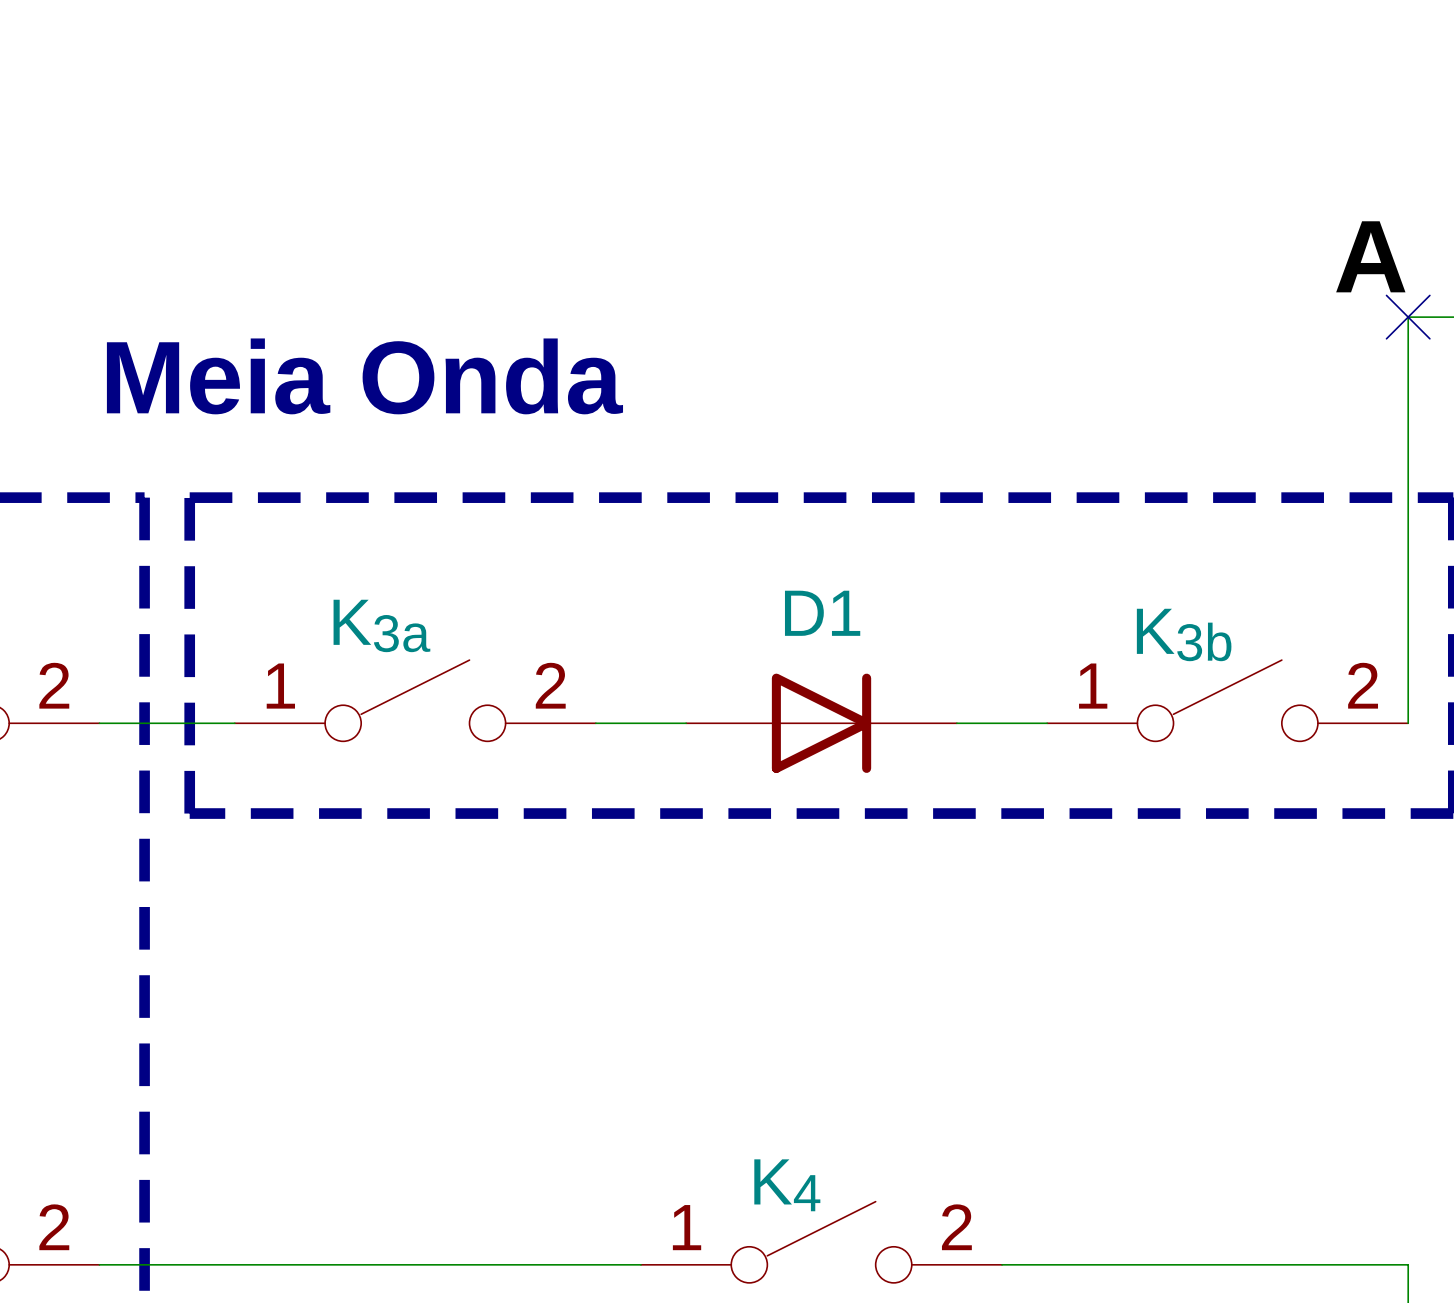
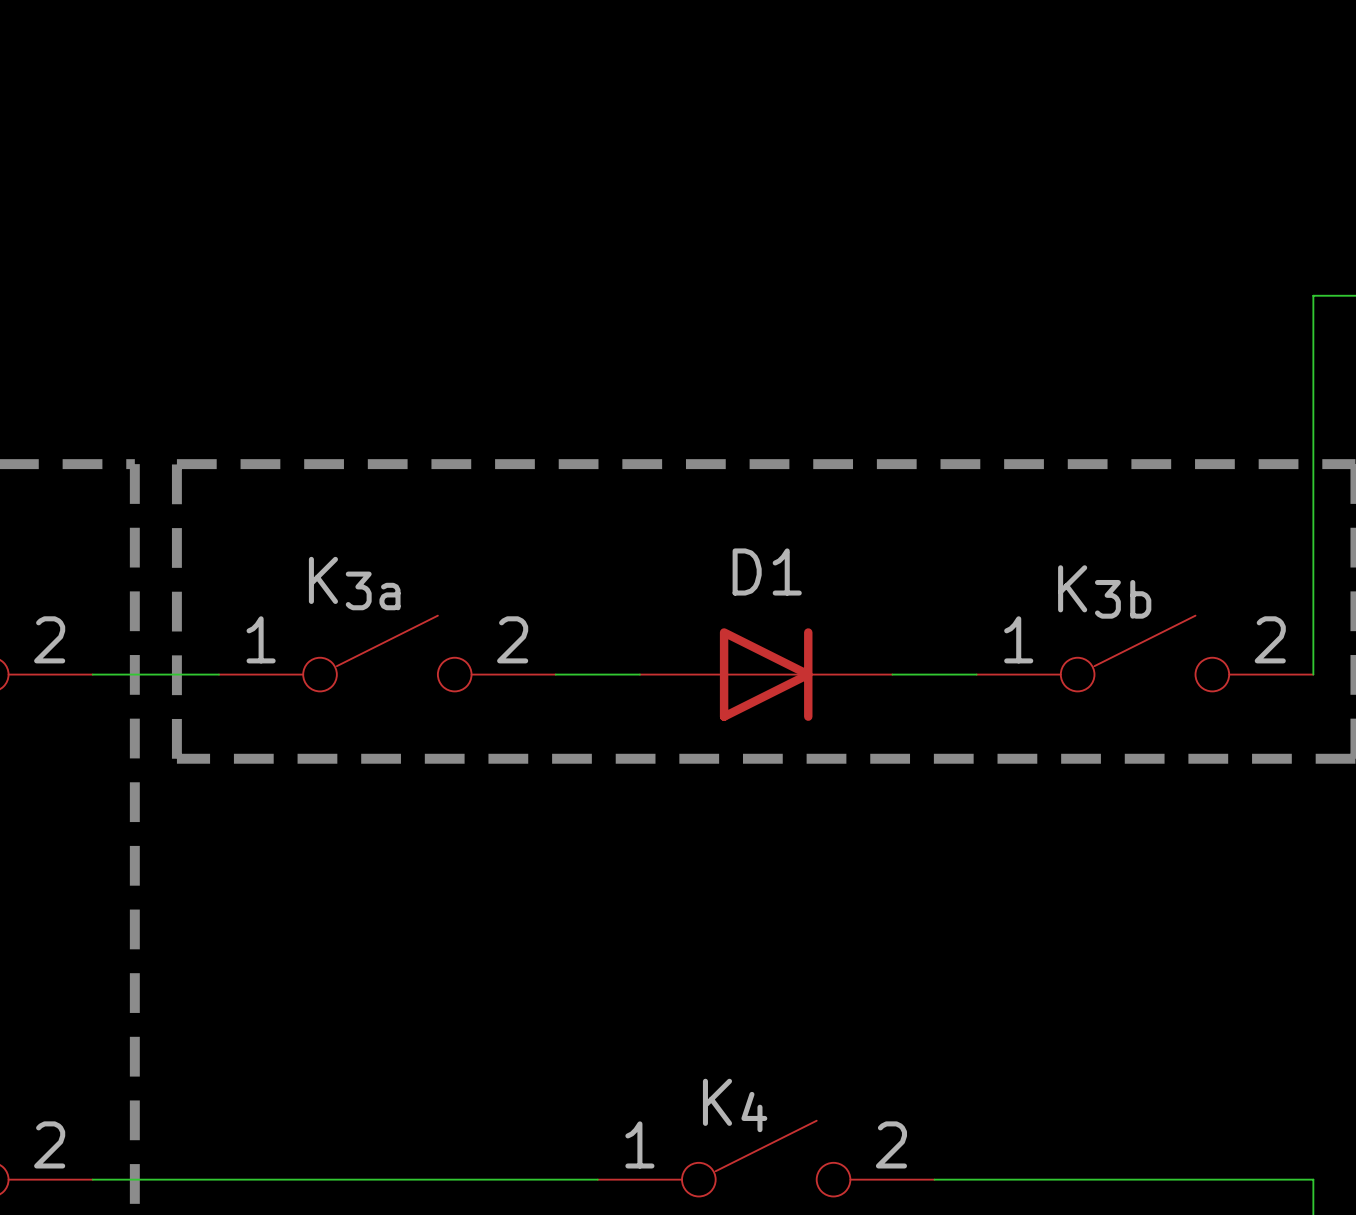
label: A (1370, 256) -> none
no-connect mark: (1408, 317) -> none
text: Meia Onda (364, 376) -> none

